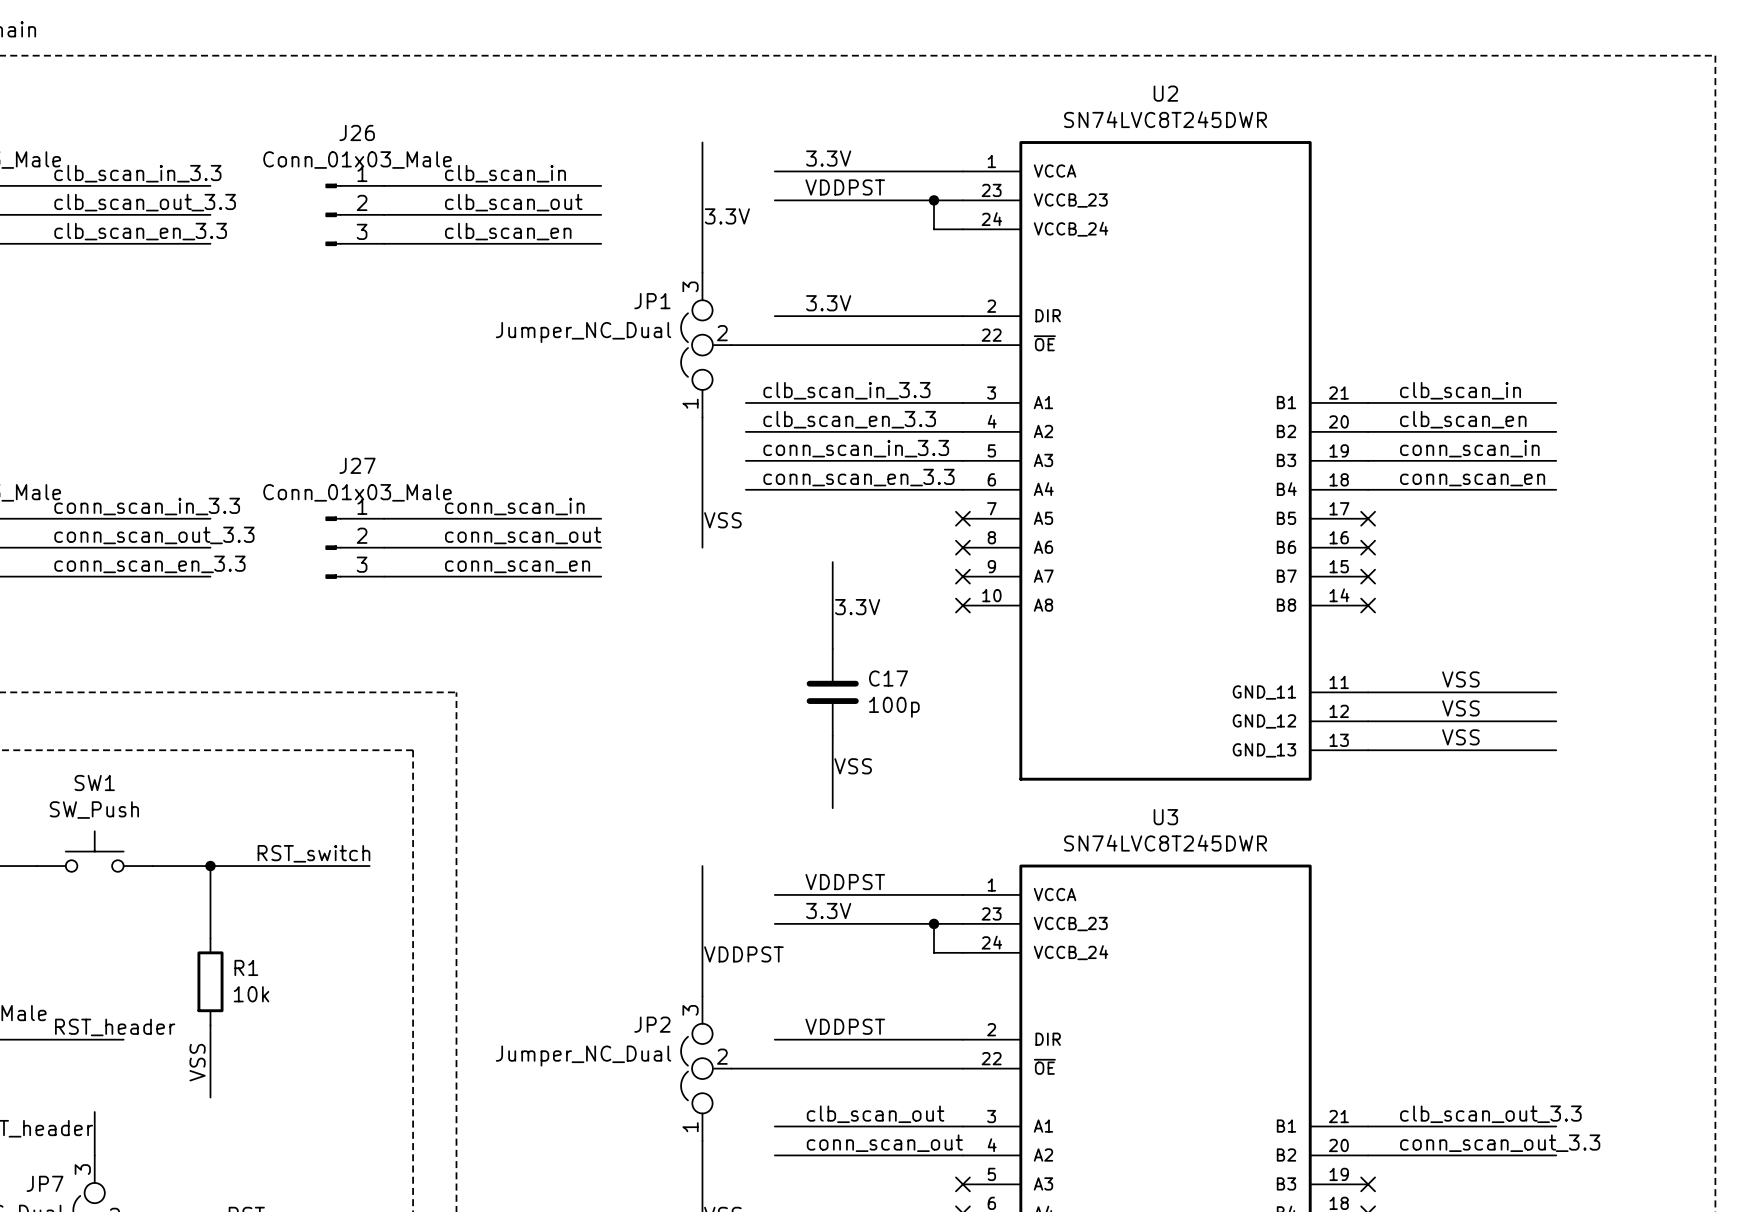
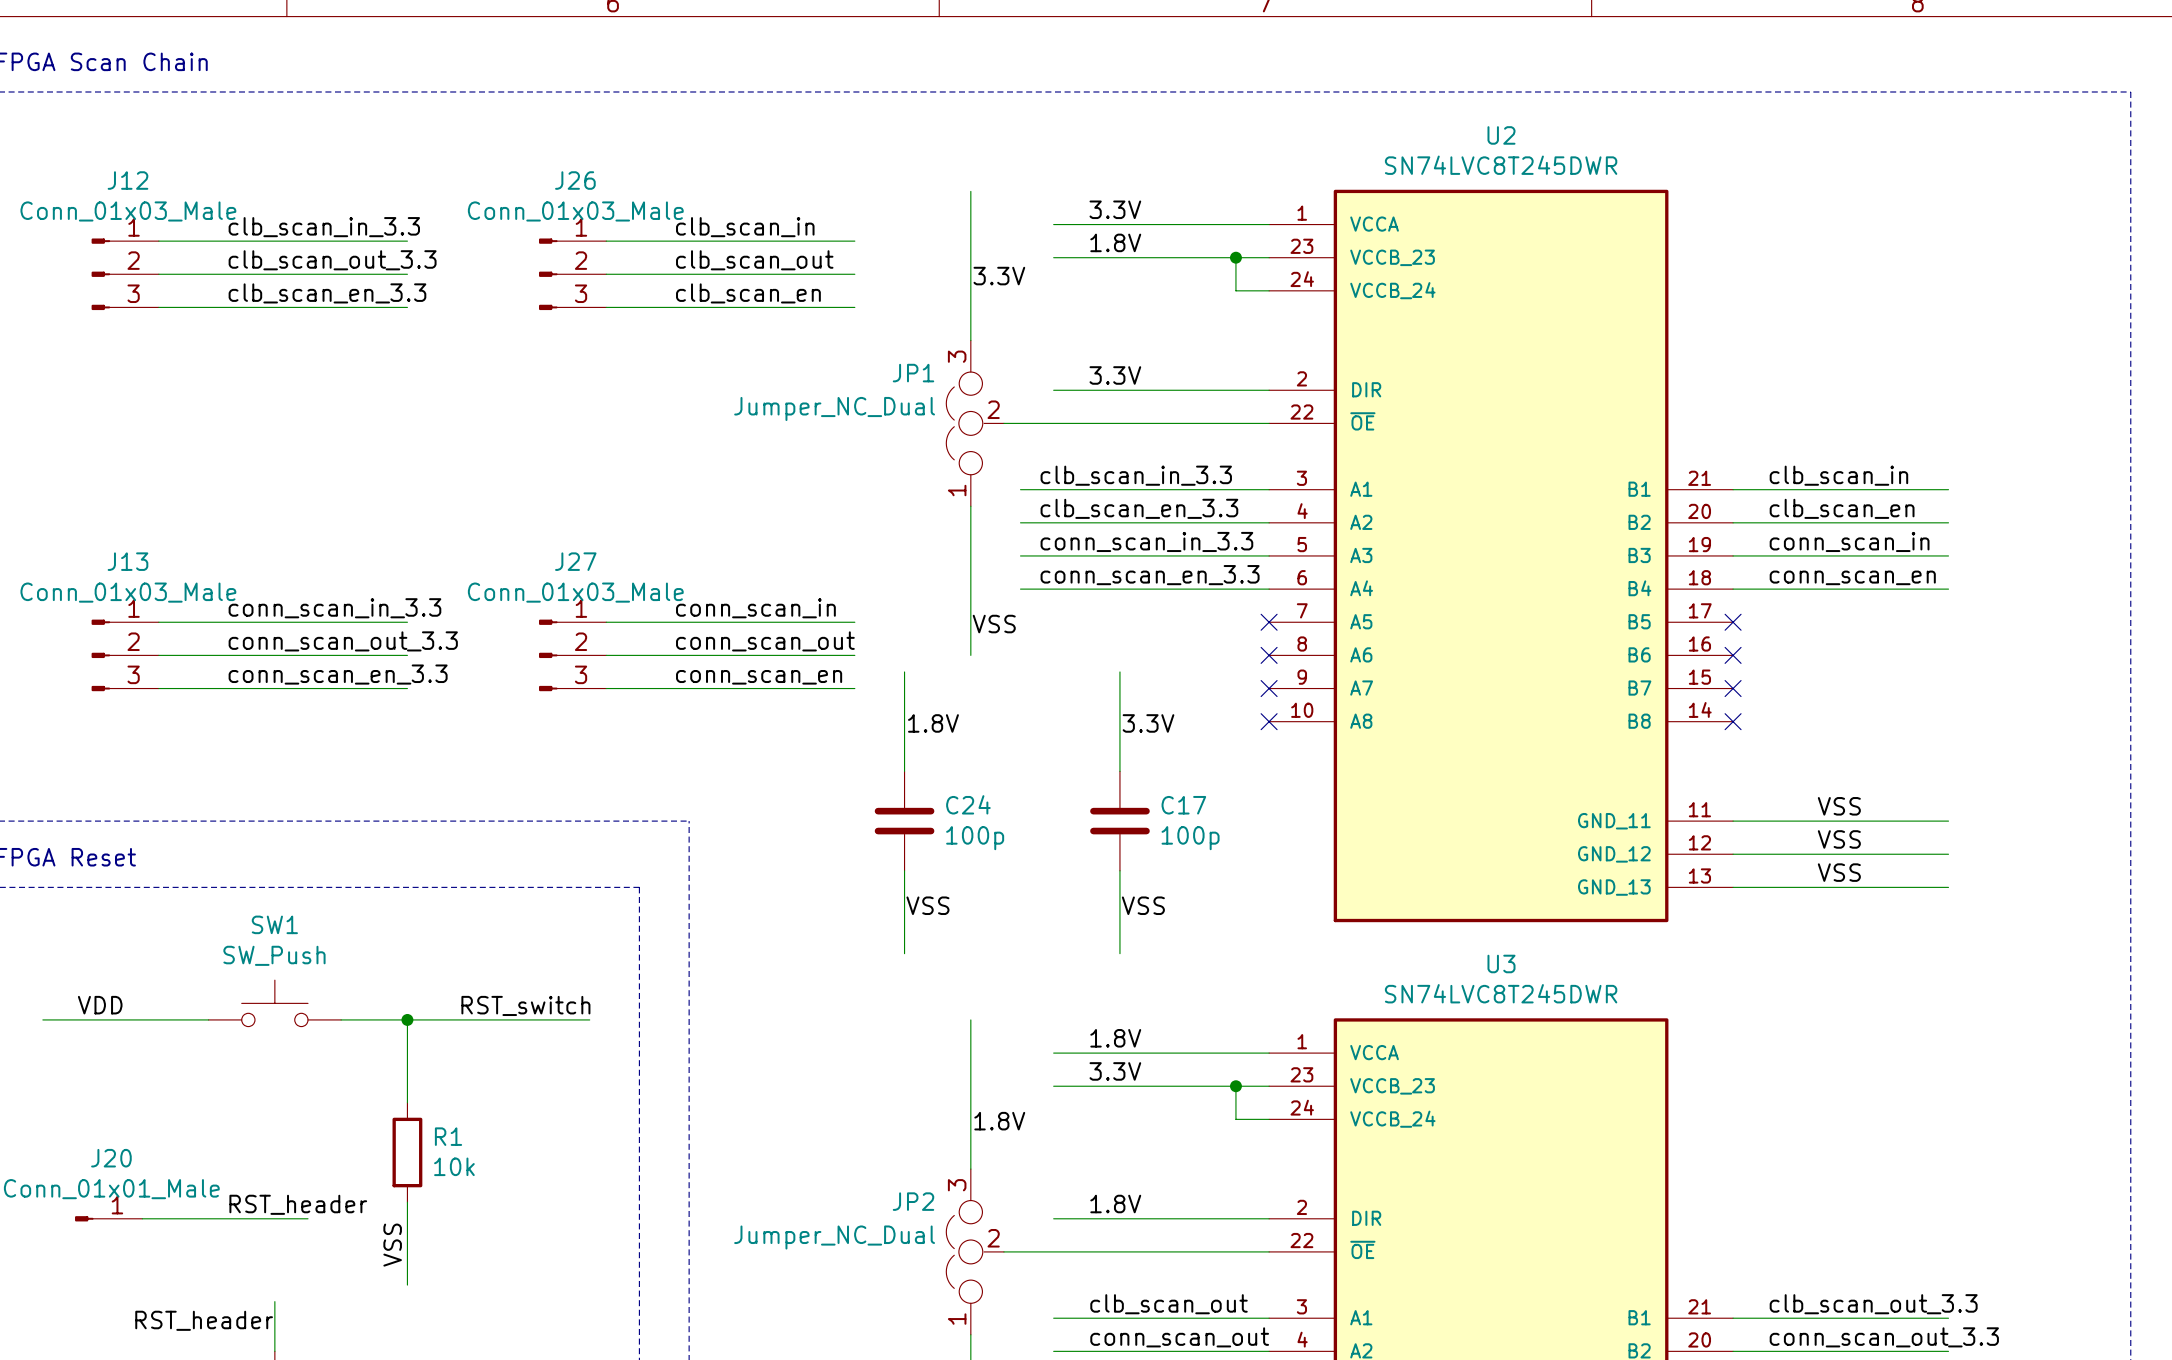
label: VDDPST (845, 187) -> 1.8V (1115, 242)
wire: none -> (904, 671) (904, 771)
label: none -> 1.8V (933, 723)
C24: none -> 100p (904, 821)
wire: none -> (904, 870) (904, 953)
label: none -> VSS (927, 905)
label: VDDPST (845, 882) -> 1.8V (1115, 1038)
label: VDDPST (743, 954) -> 1.8V (999, 1121)
label: VDDPST (845, 1026) -> 1.8V (1115, 1204)

